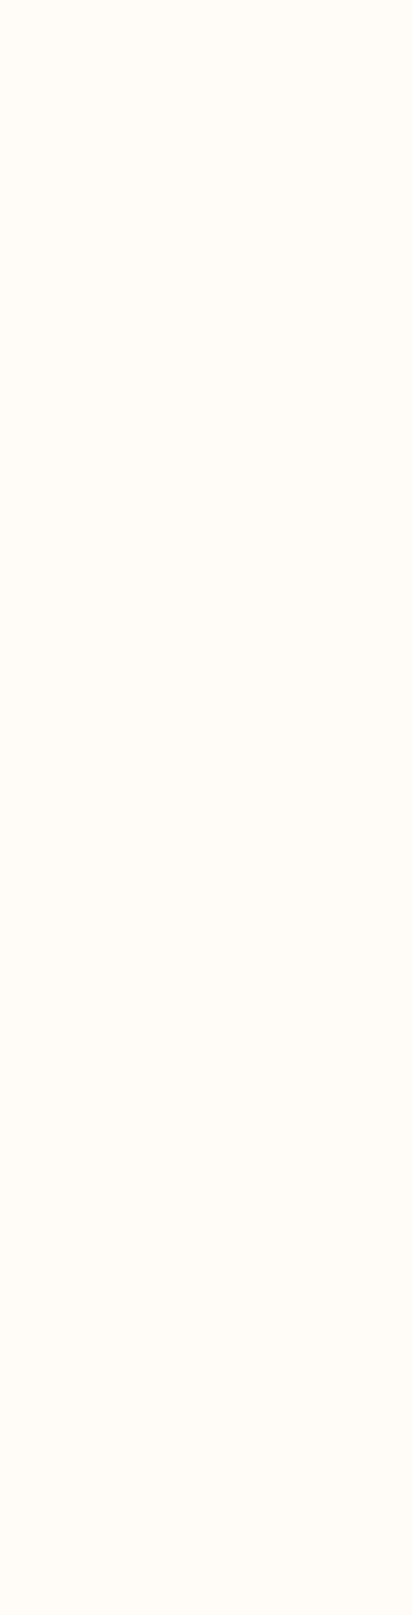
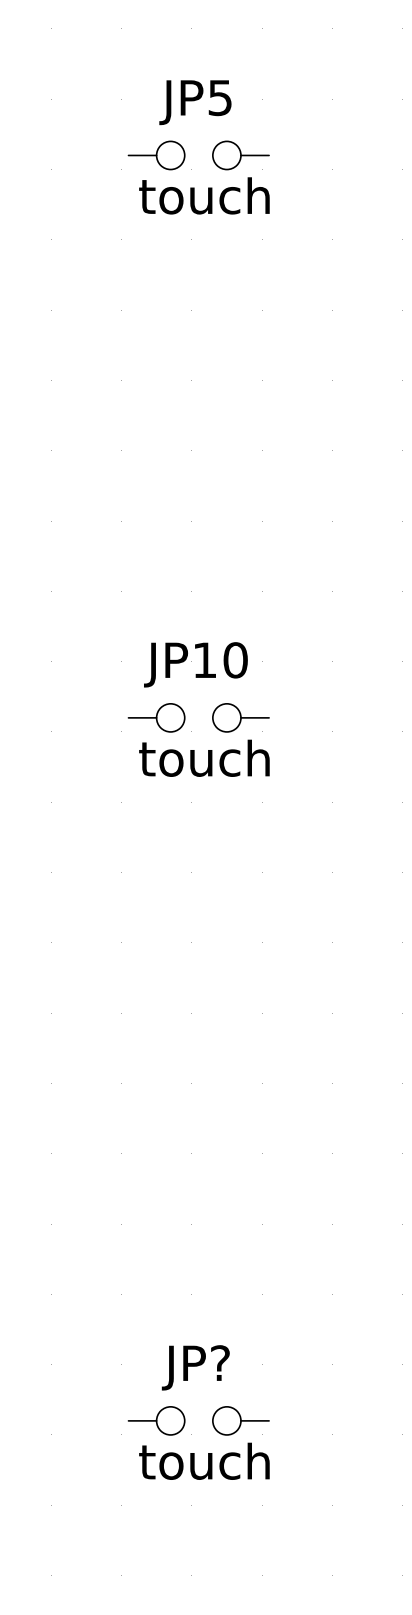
JP5: none -> touch (198, 155)
JP10: none -> touch (198, 717)
JP?: none -> touch (198, 1420)

